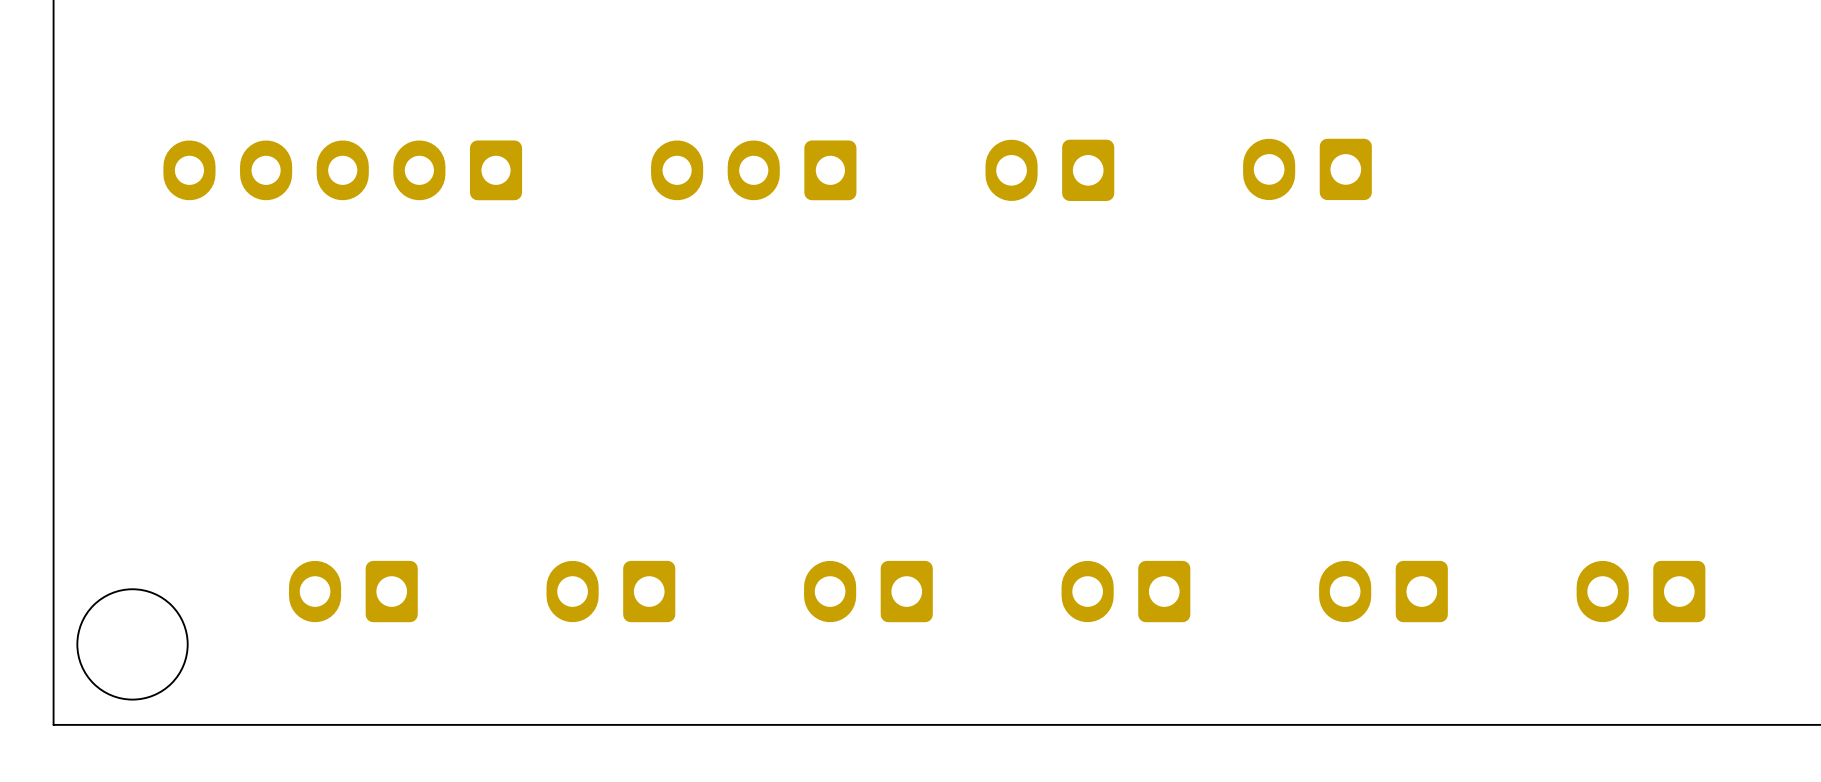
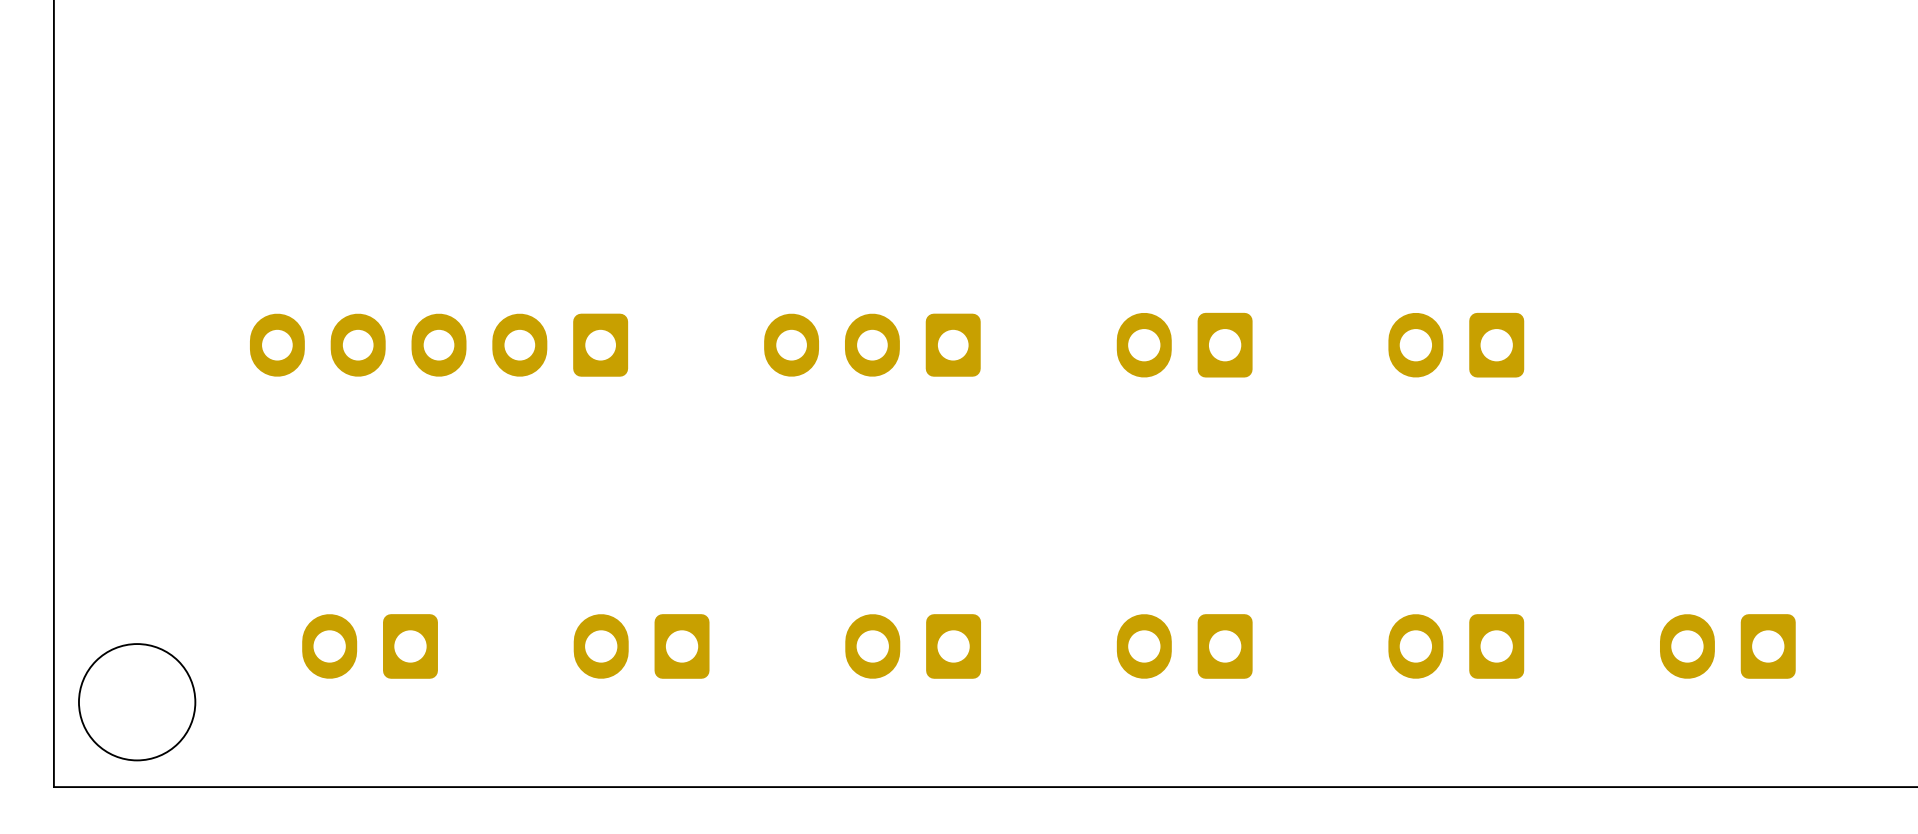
part: (1307, 169) -> none
part position: (342, 170) -> (439, 345)
part position: (753, 170) -> (872, 345)
part: (1049, 170) -> none
part: none -> (1184, 345)
part: none -> (1456, 345)

